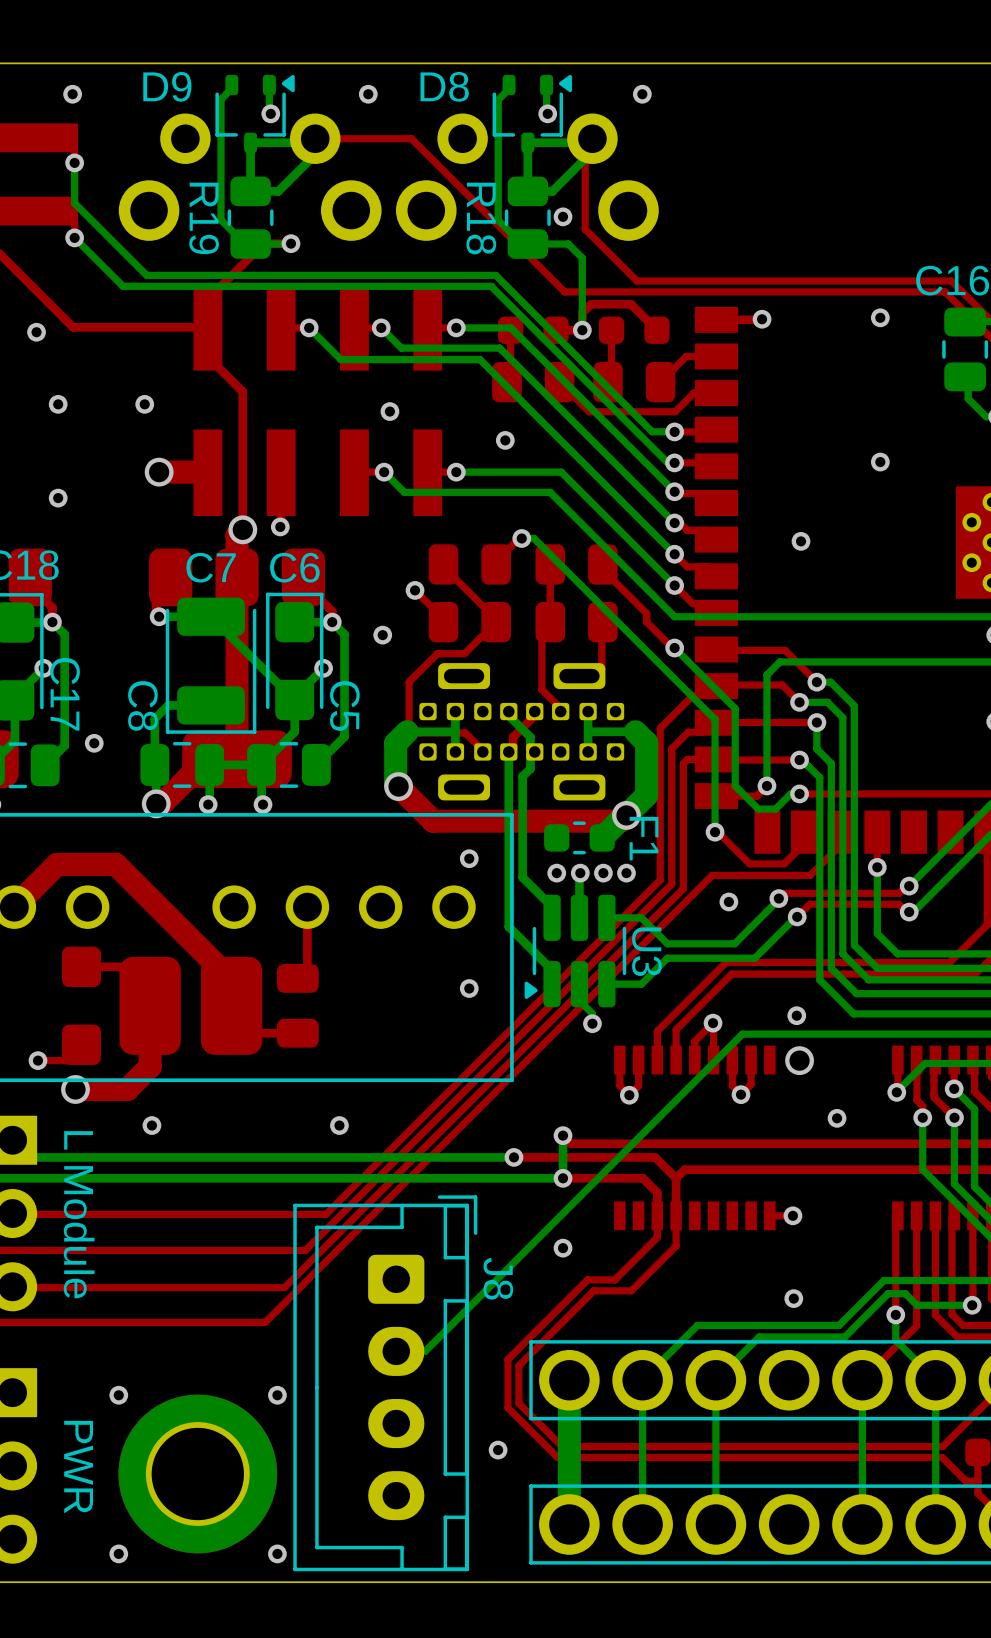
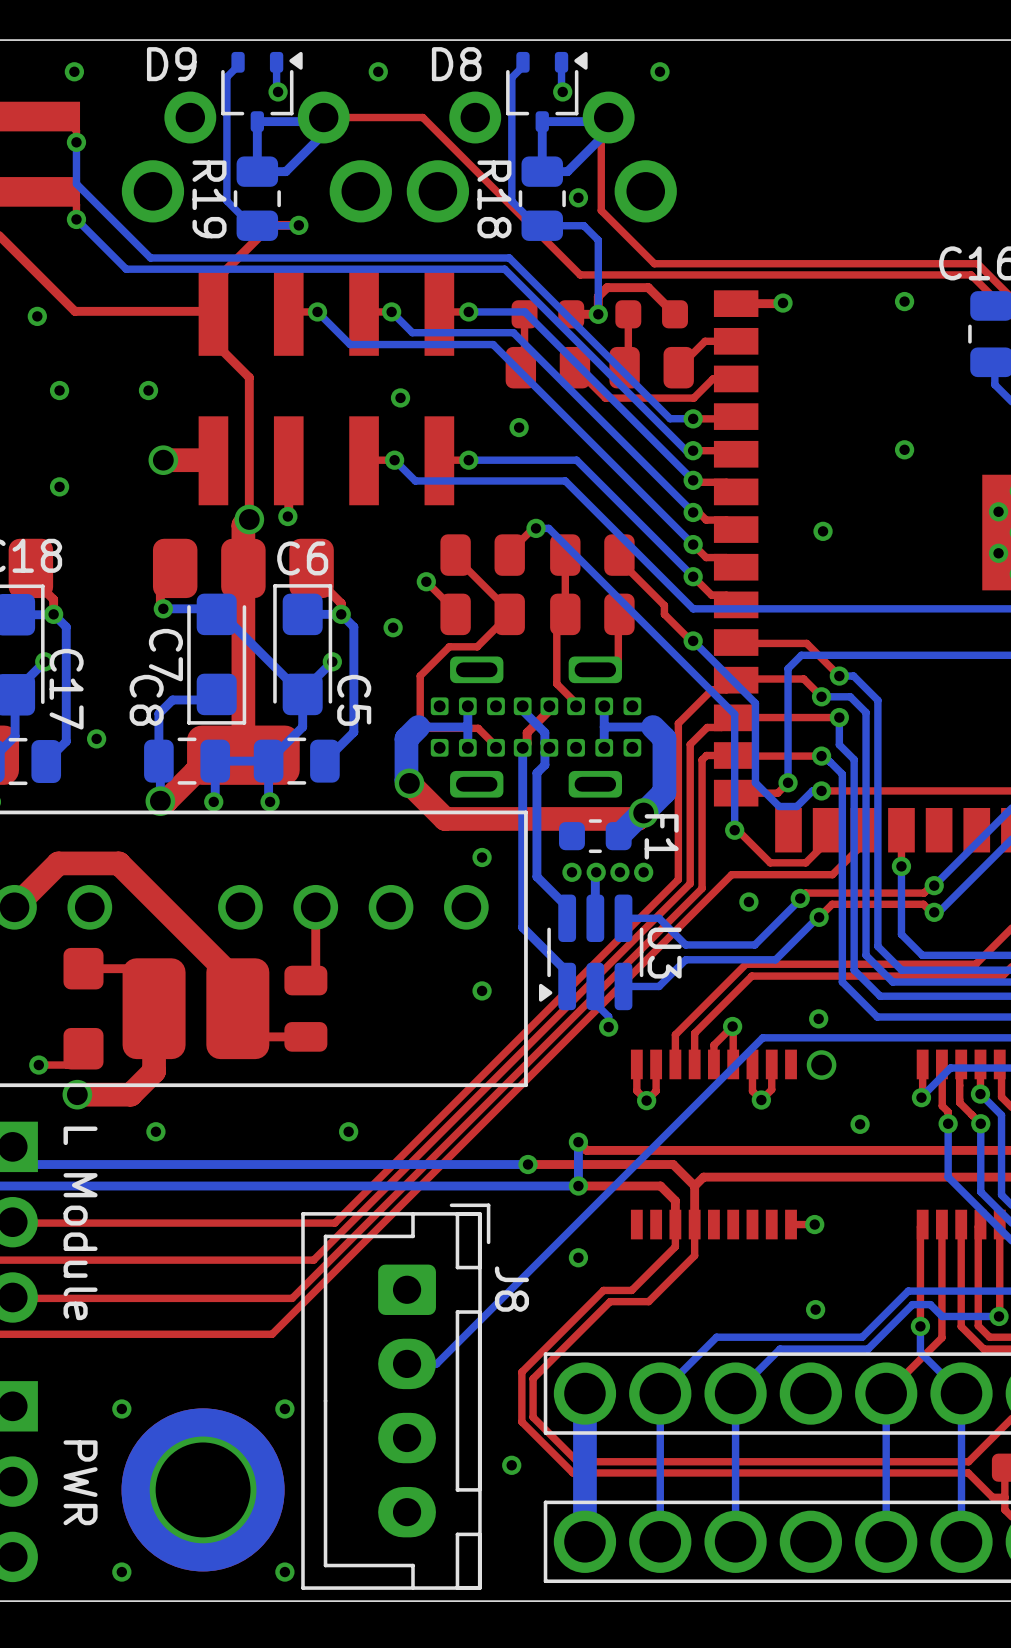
C7 name rotation: 0° (211, 567) -> 90° clockwise (165, 655)
C7 name position: C7 (211, 567) -> C7 (165, 655)
C7 footprint: [165, 597, 257, 734] -> [187, 593, 247, 725]

